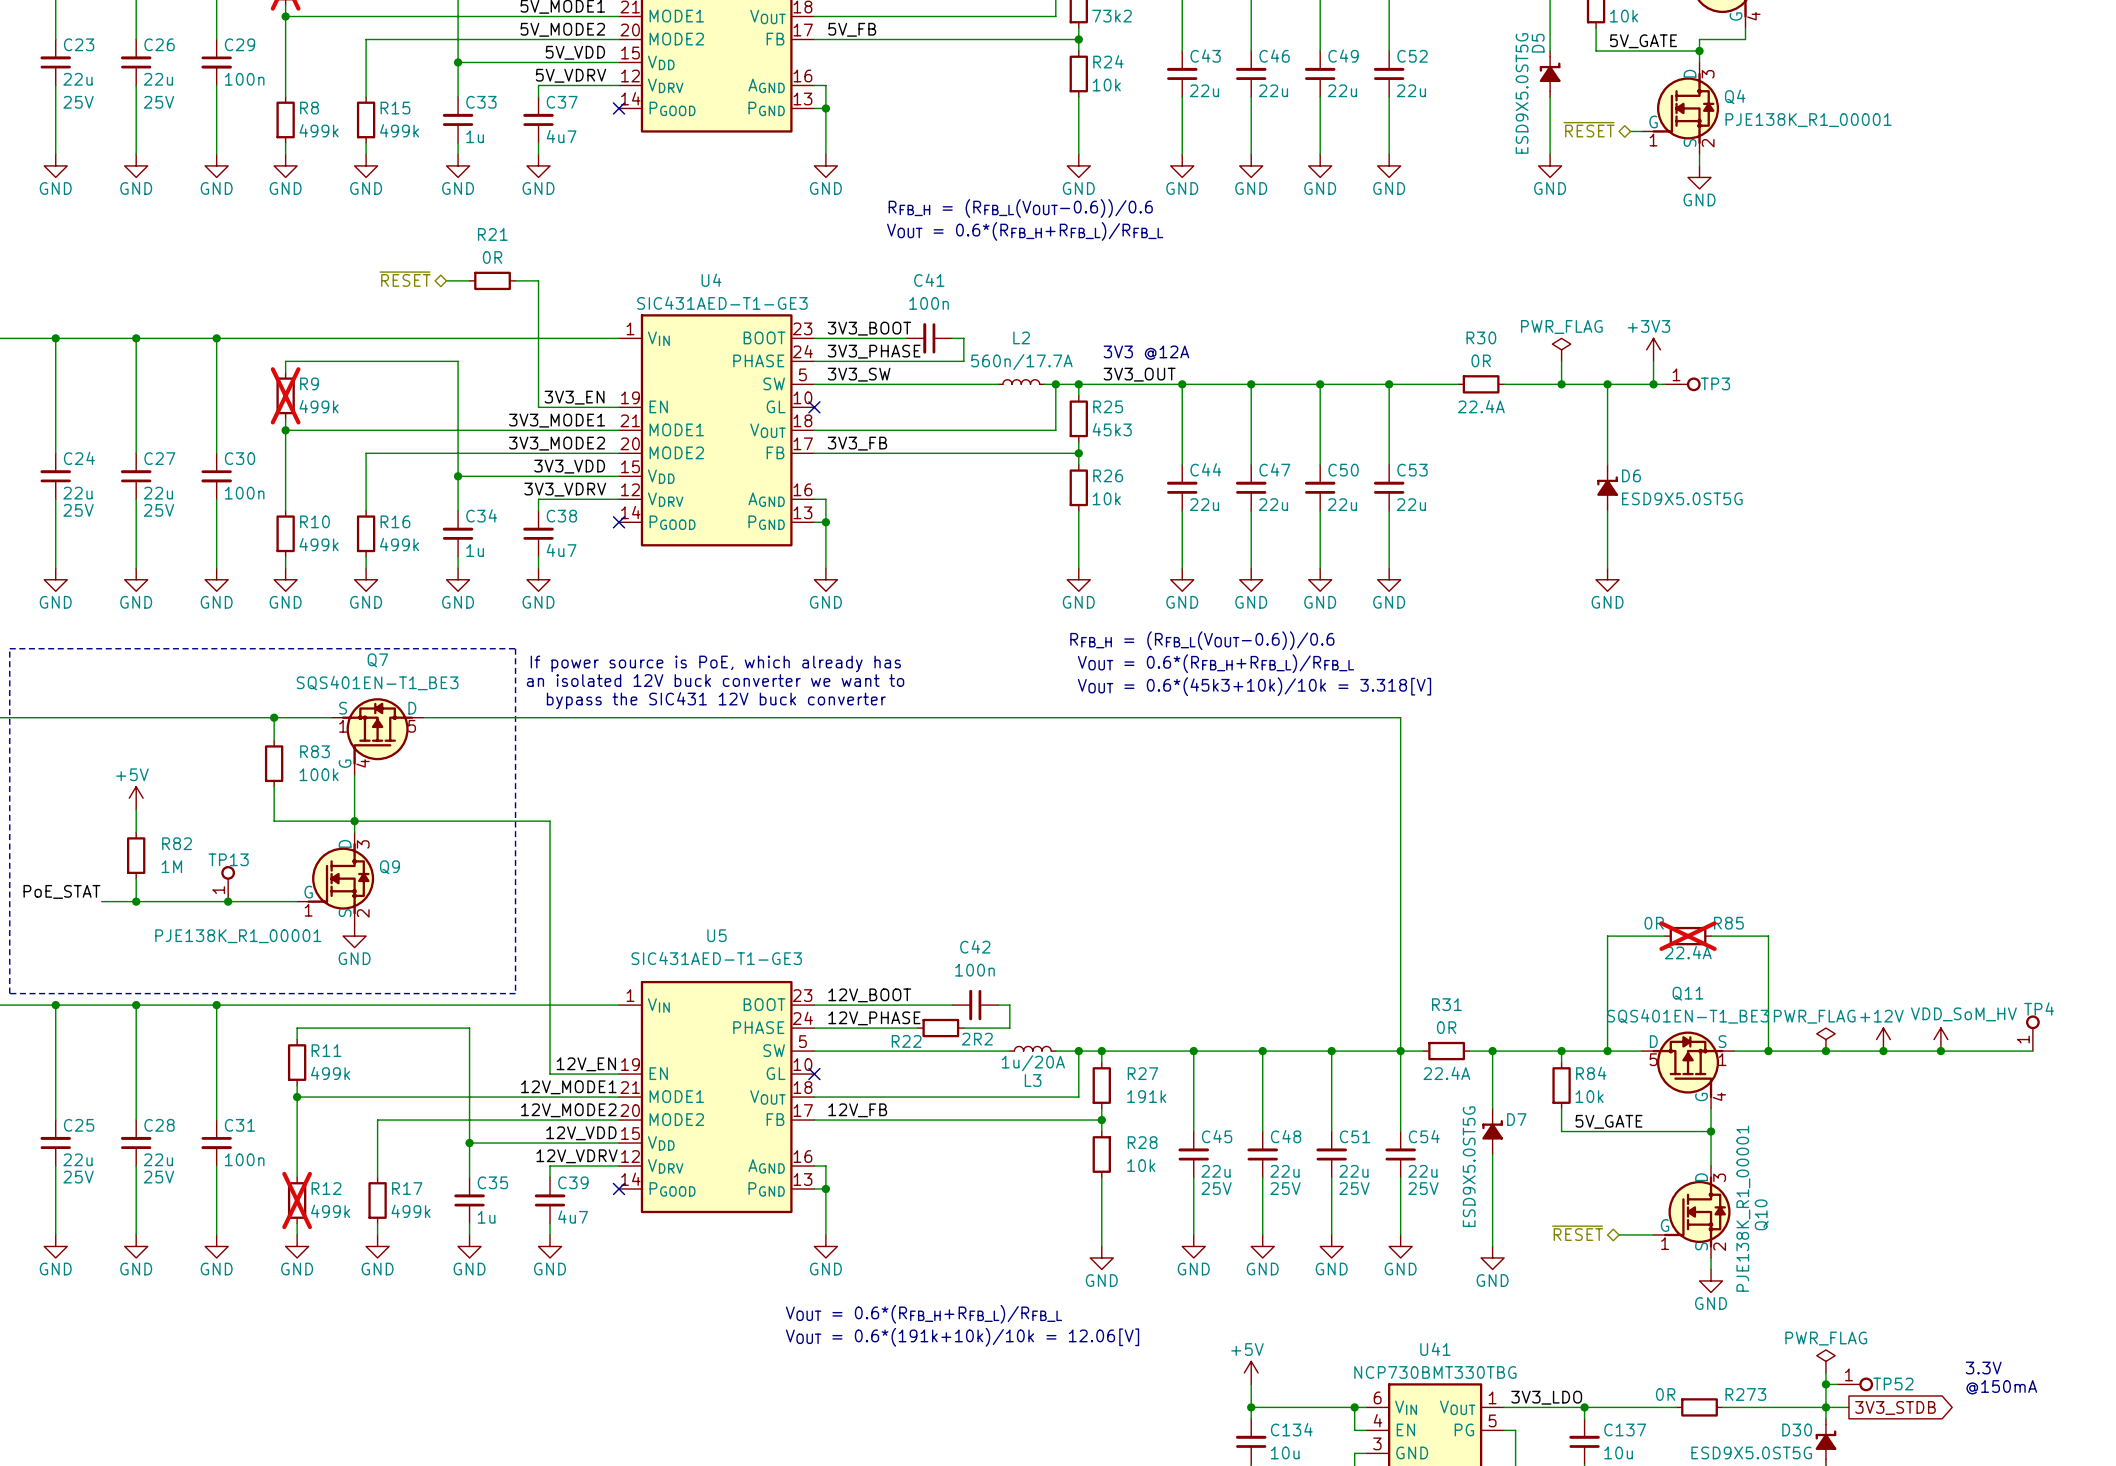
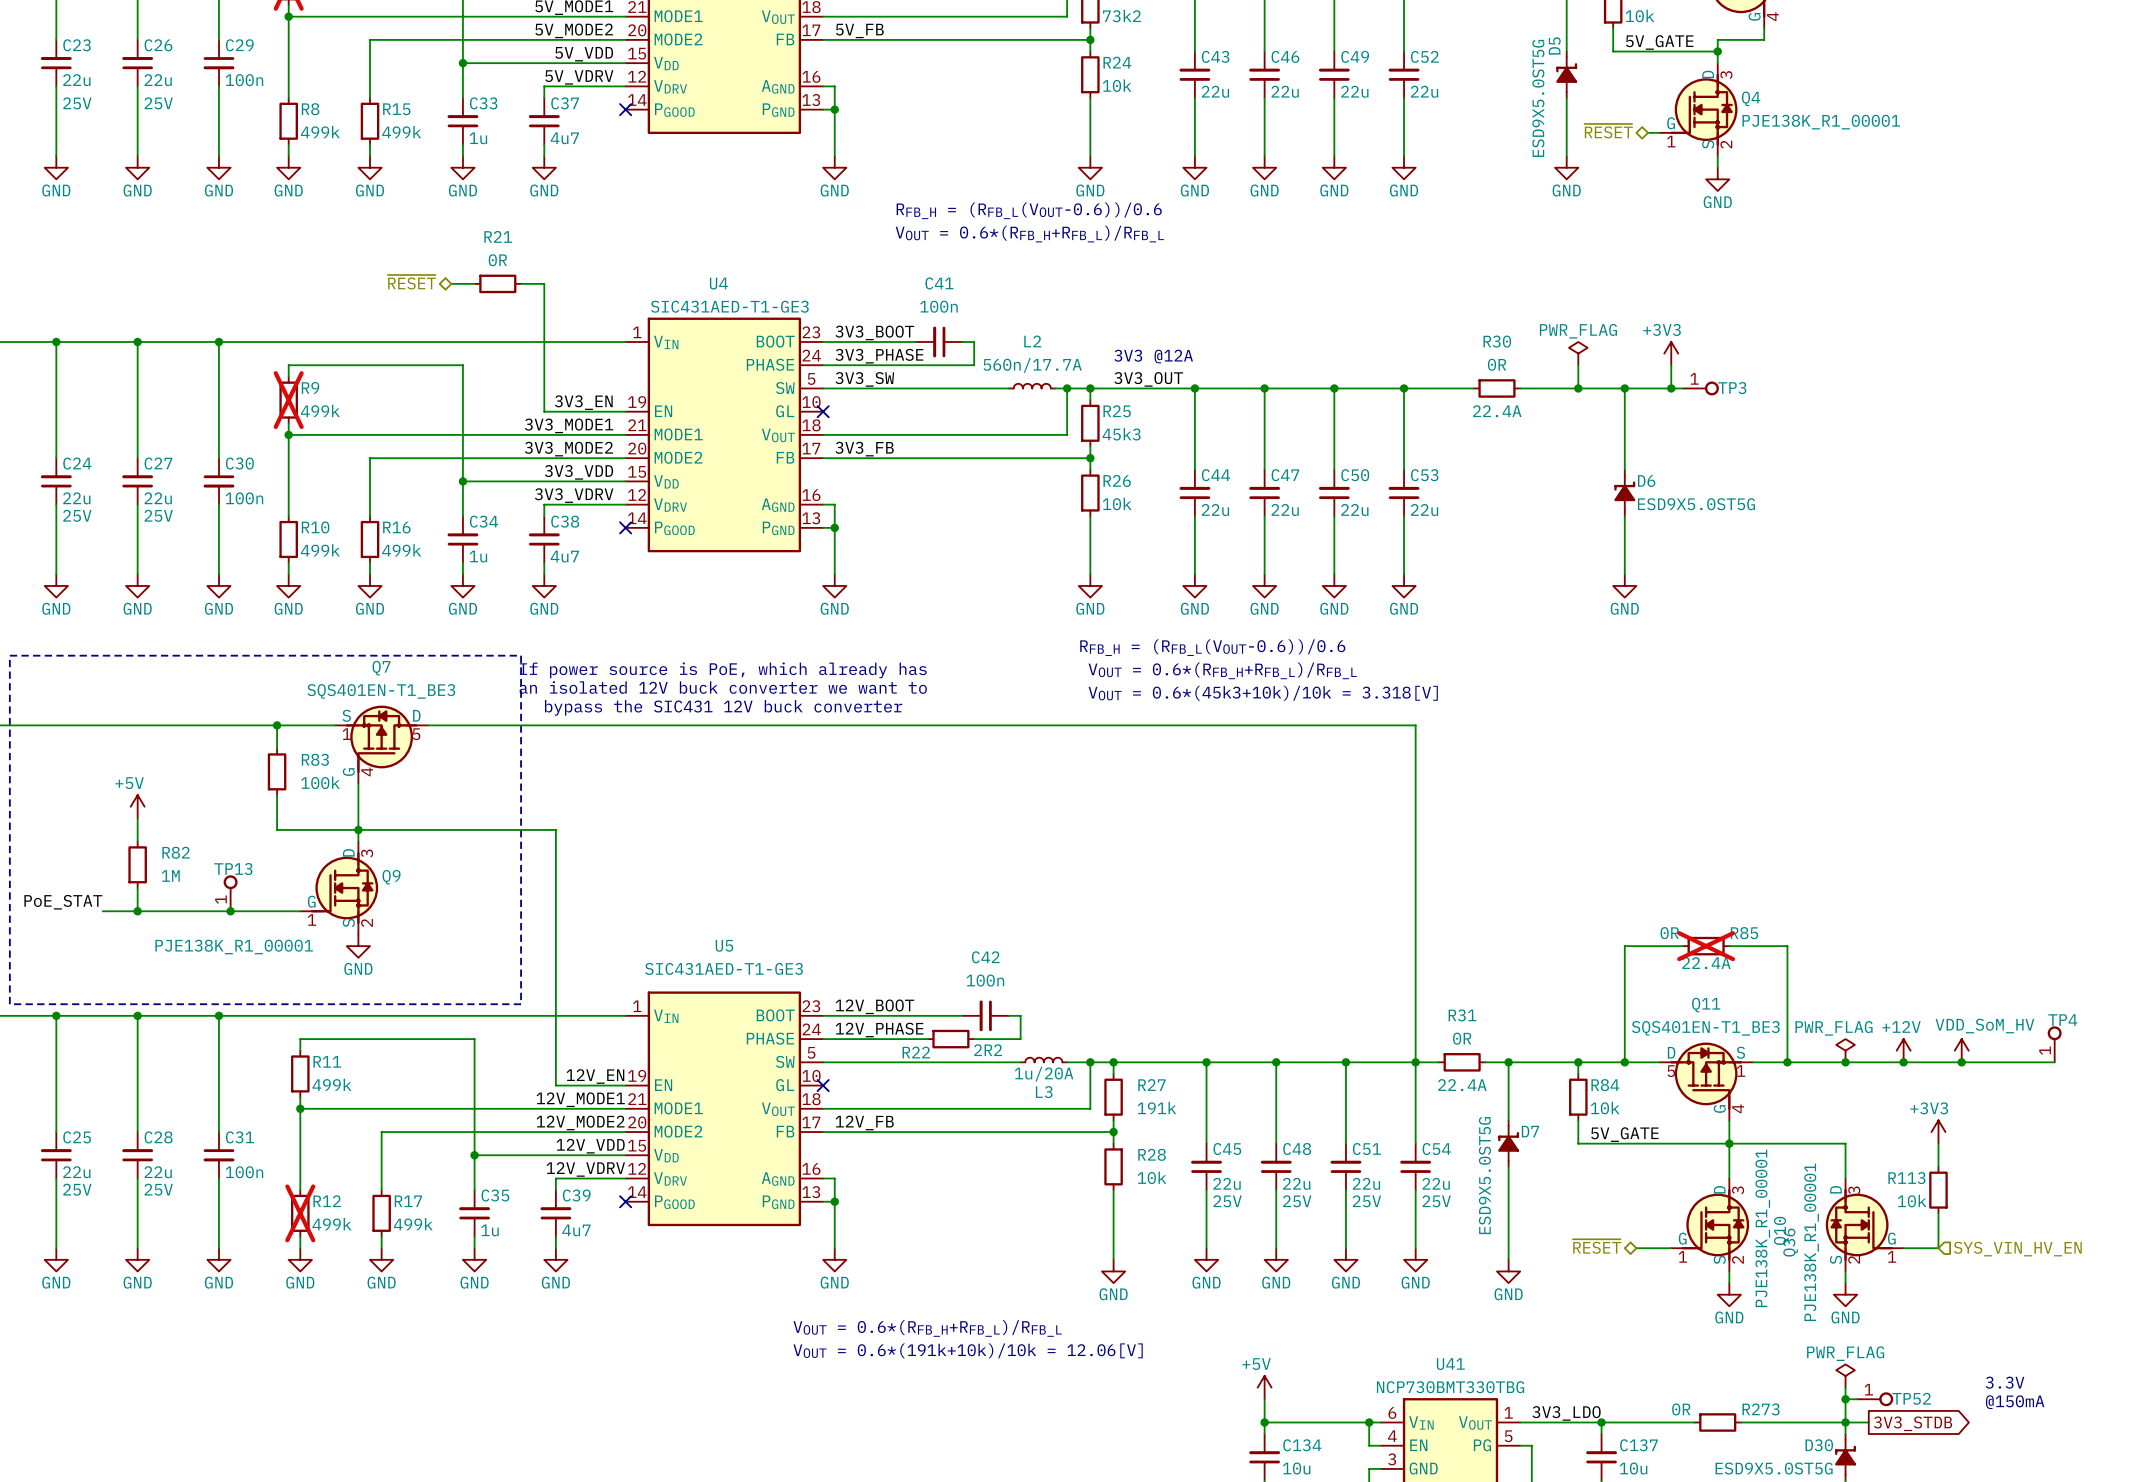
power symbol: none -> +3V3 (1938, 1132)
wire: none -> (1729, 1143) (1845, 1143) (1845, 1178)
wire: none -> (1938, 1143) (1938, 1166)
R113: none -> (1938, 1190)
wire: none -> (1938, 1213) (1938, 1248) (1903, 1248)
Q36: none -> (1864, 1224)
hierarchical label: none -> SYS_VIN_HV_EN (2017, 1249)
wire: none -> (1845, 1271) (1845, 1283)
power symbol: none -> GND (1845, 1294)

